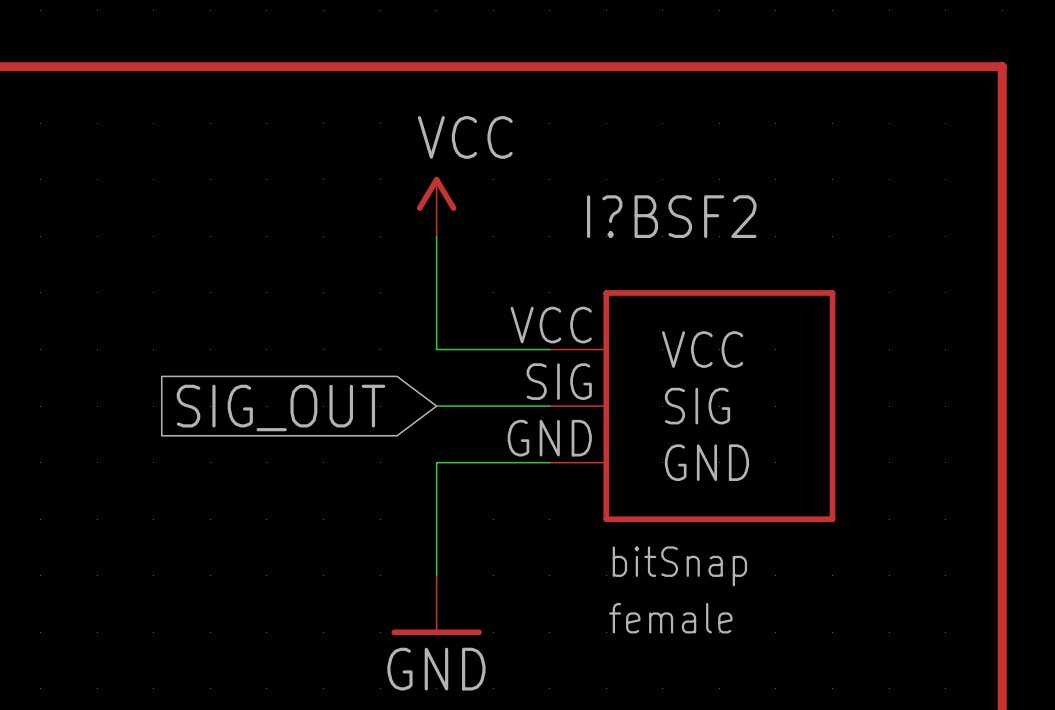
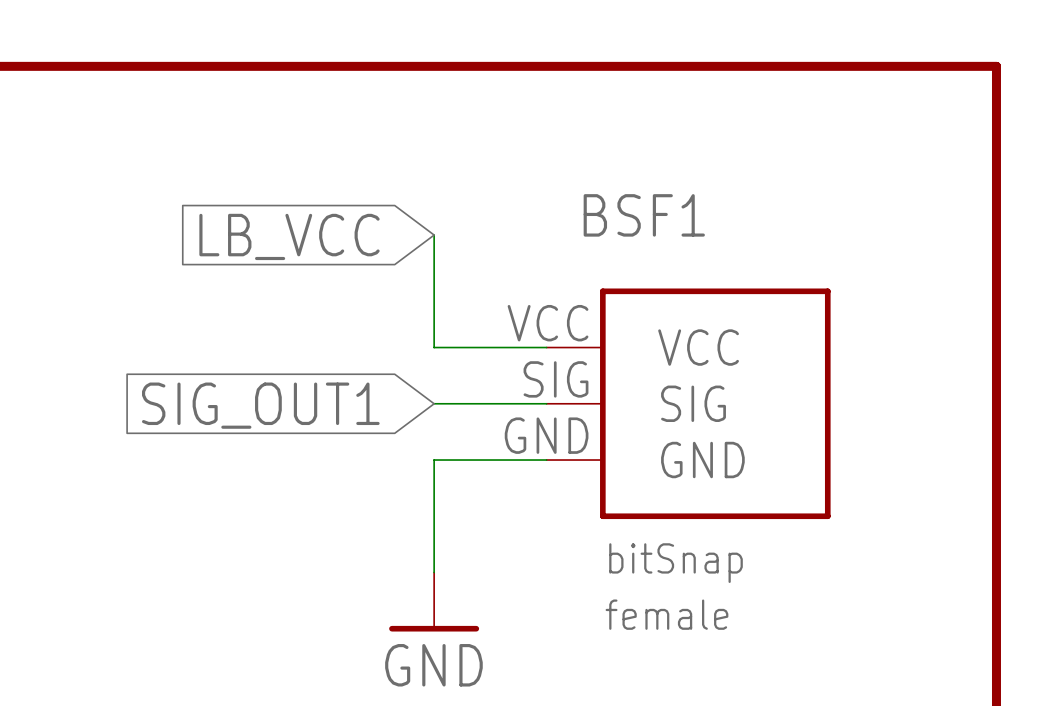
power symbol: VCC (436, 206) -> none
I?BSF2 name: I?BSF2 (671, 216) -> BSF1 (644, 215)
global label: none -> LB_VCC (289, 236)
global label: SIG_OUT (280, 407) -> SIG_OUT1 (260, 405)

